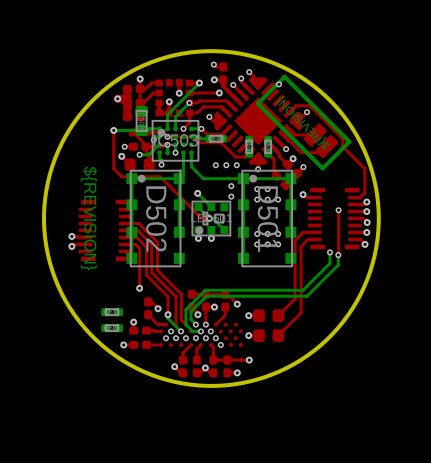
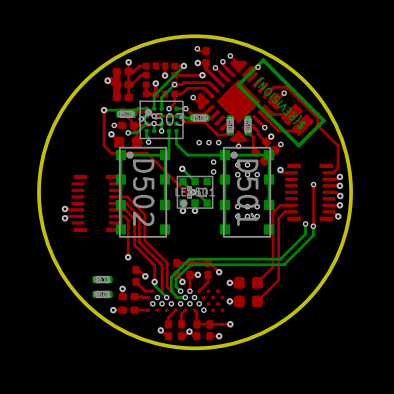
part footprint: [135, 105, 148, 137] -> [116, 110, 137, 119]
text: ${REVISION} (88, 218) -> none

